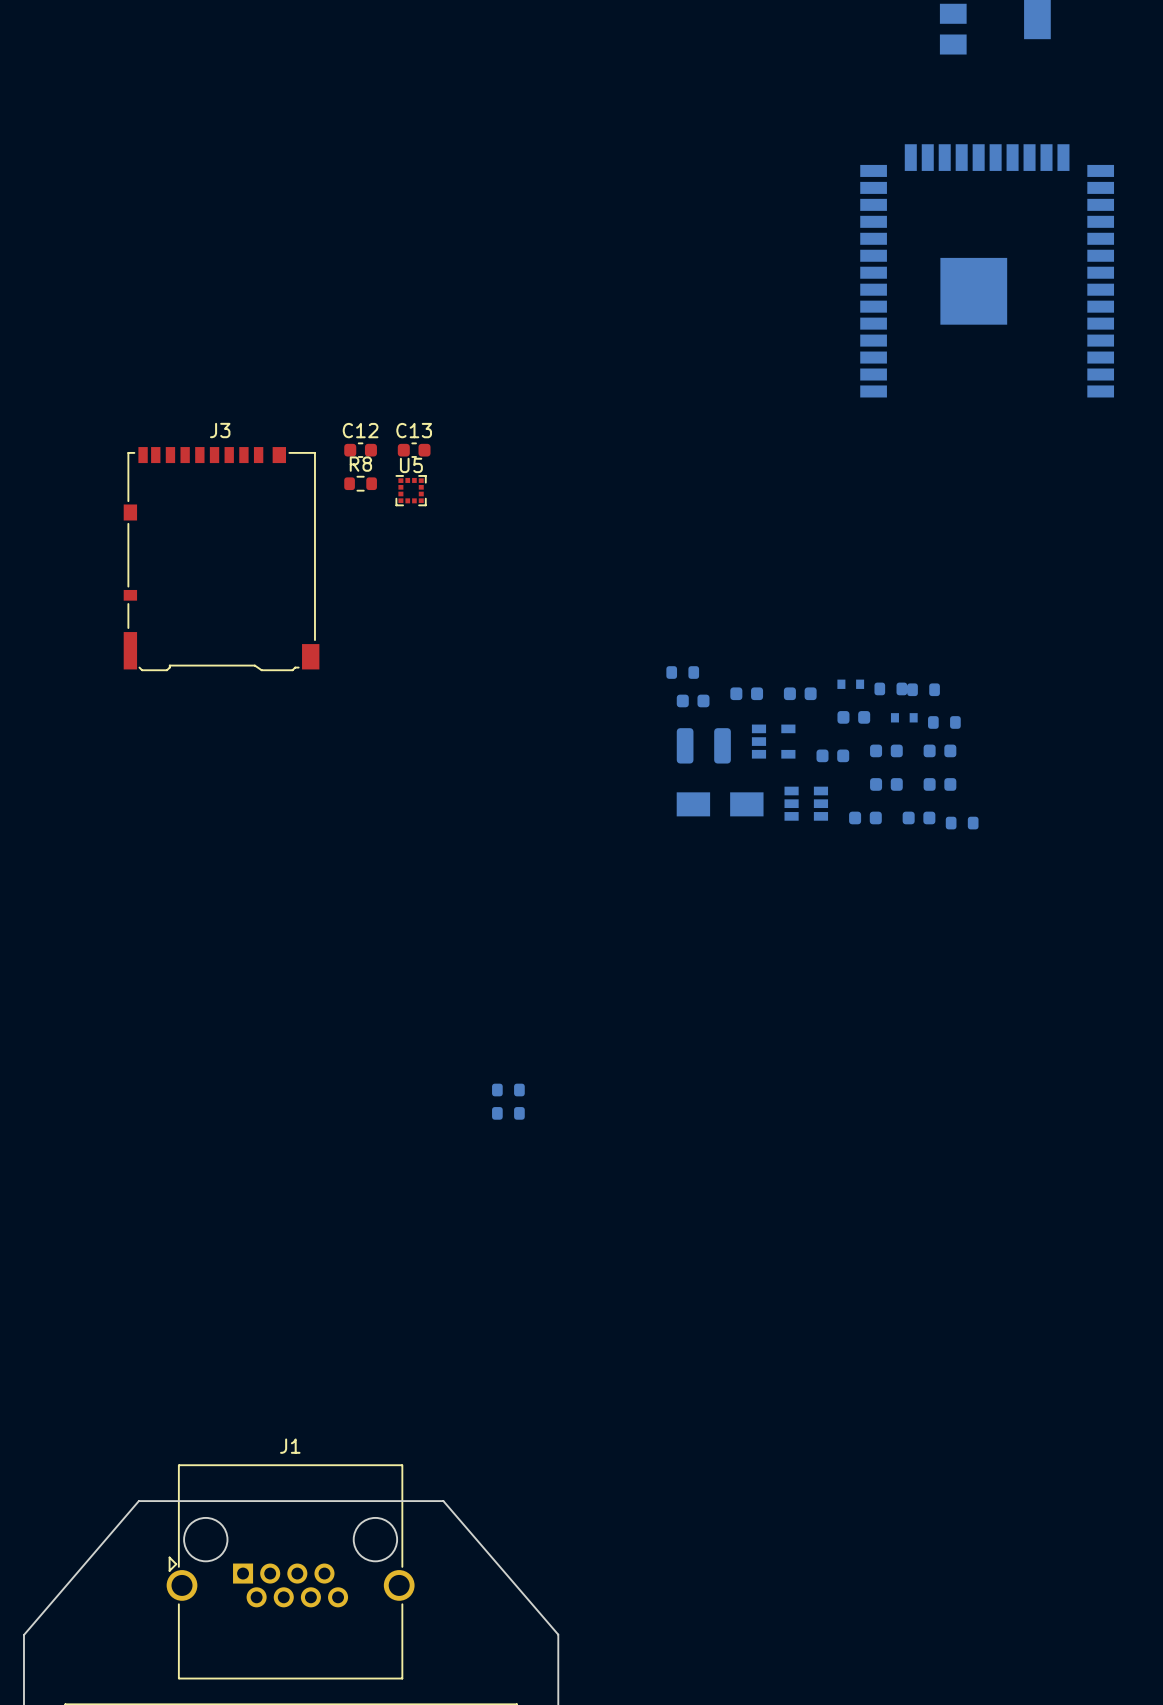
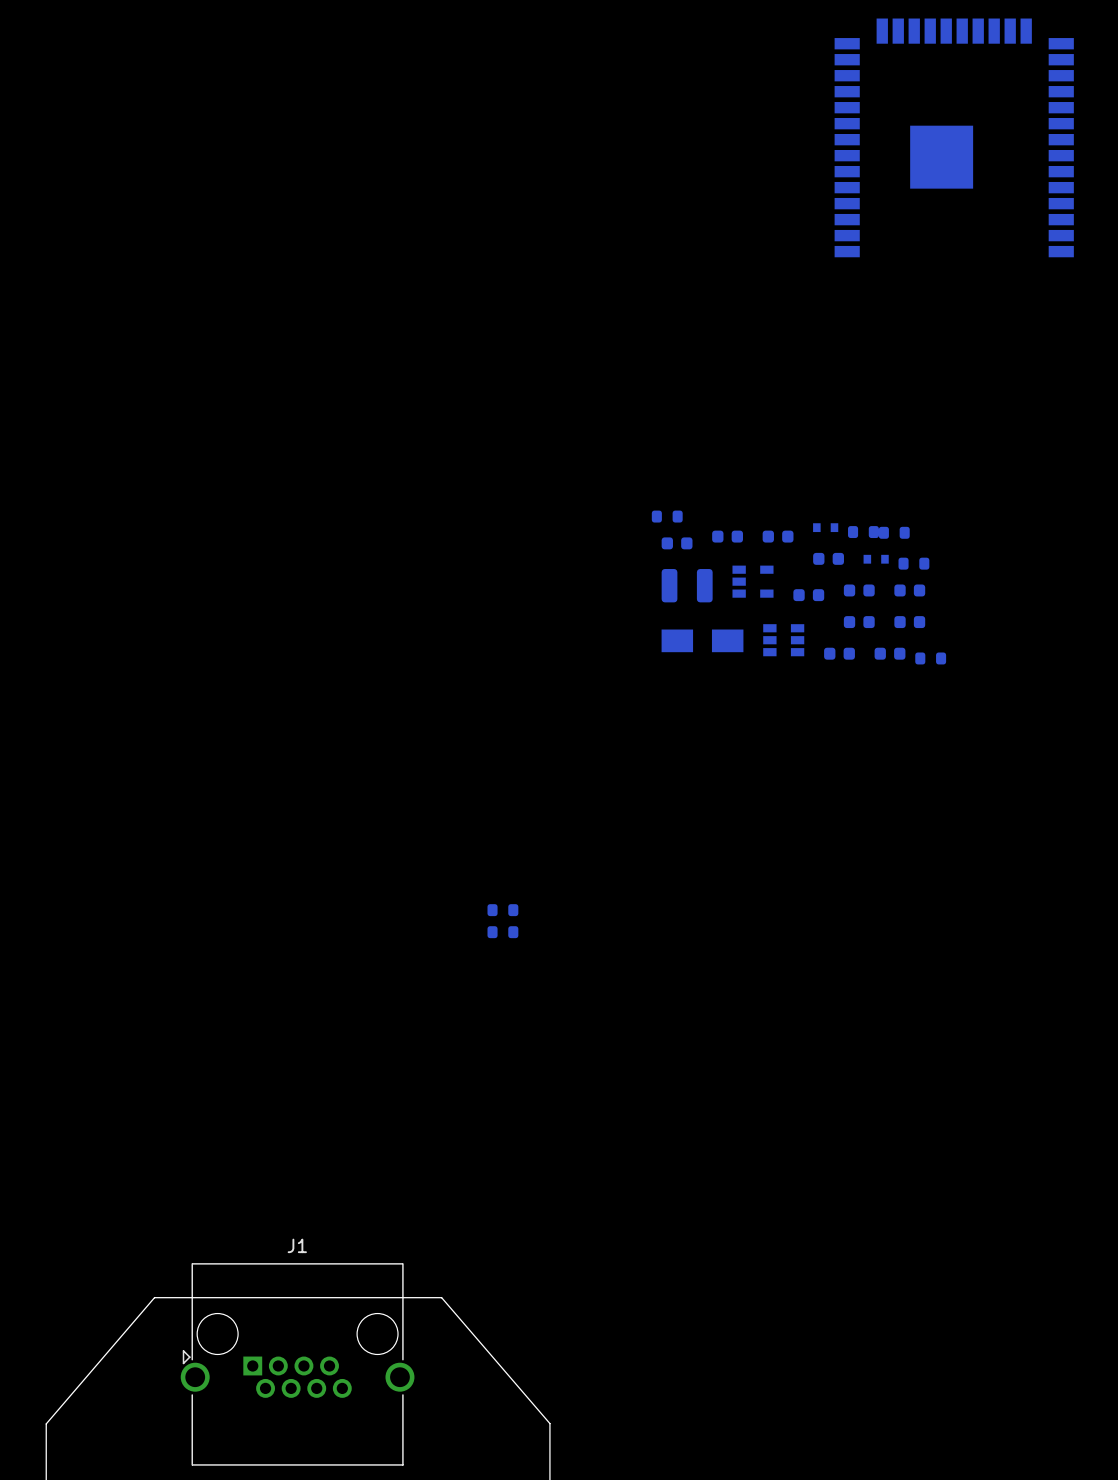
C12: (360, 450) -> none
C13: (414, 450) -> none
R8: (360, 483) -> none
U5: (411, 490) -> none
J3: (221, 559) -> none

